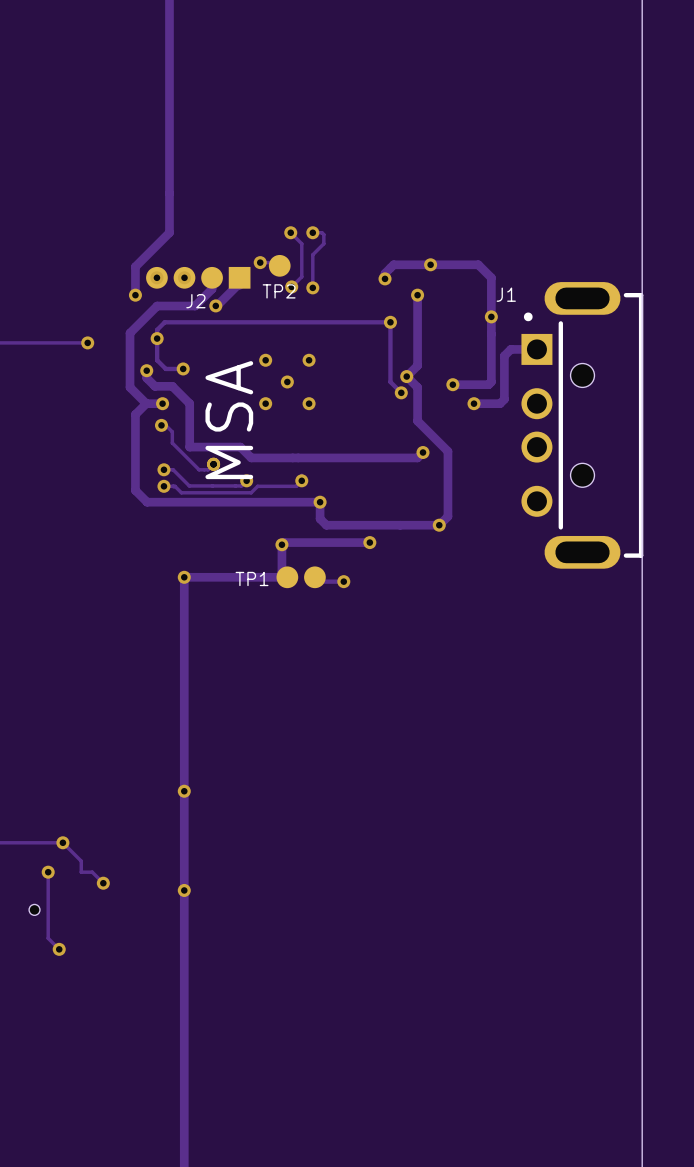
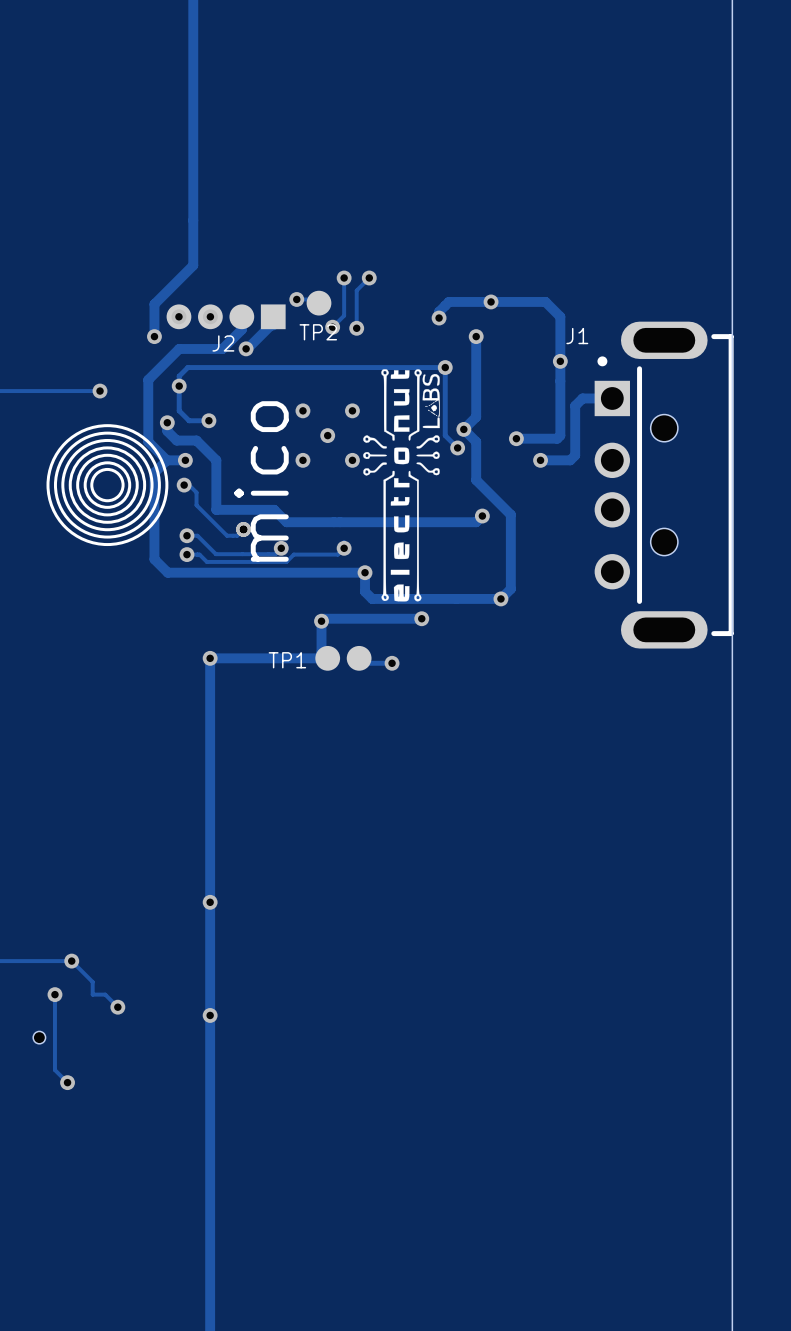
track: (290, 232) (301, 243) -> none
via: (290, 232) -> none
track: (312, 232) (323, 234) (323, 243) -> none
via: (312, 232) -> none
via: none -> (344, 278)
via: none -> (369, 278)
drawing: none -> [363, 369, 440, 602]
drawing: none -> [46, 424, 169, 547]
text: MSA (229, 420) -> mico (261, 481)

